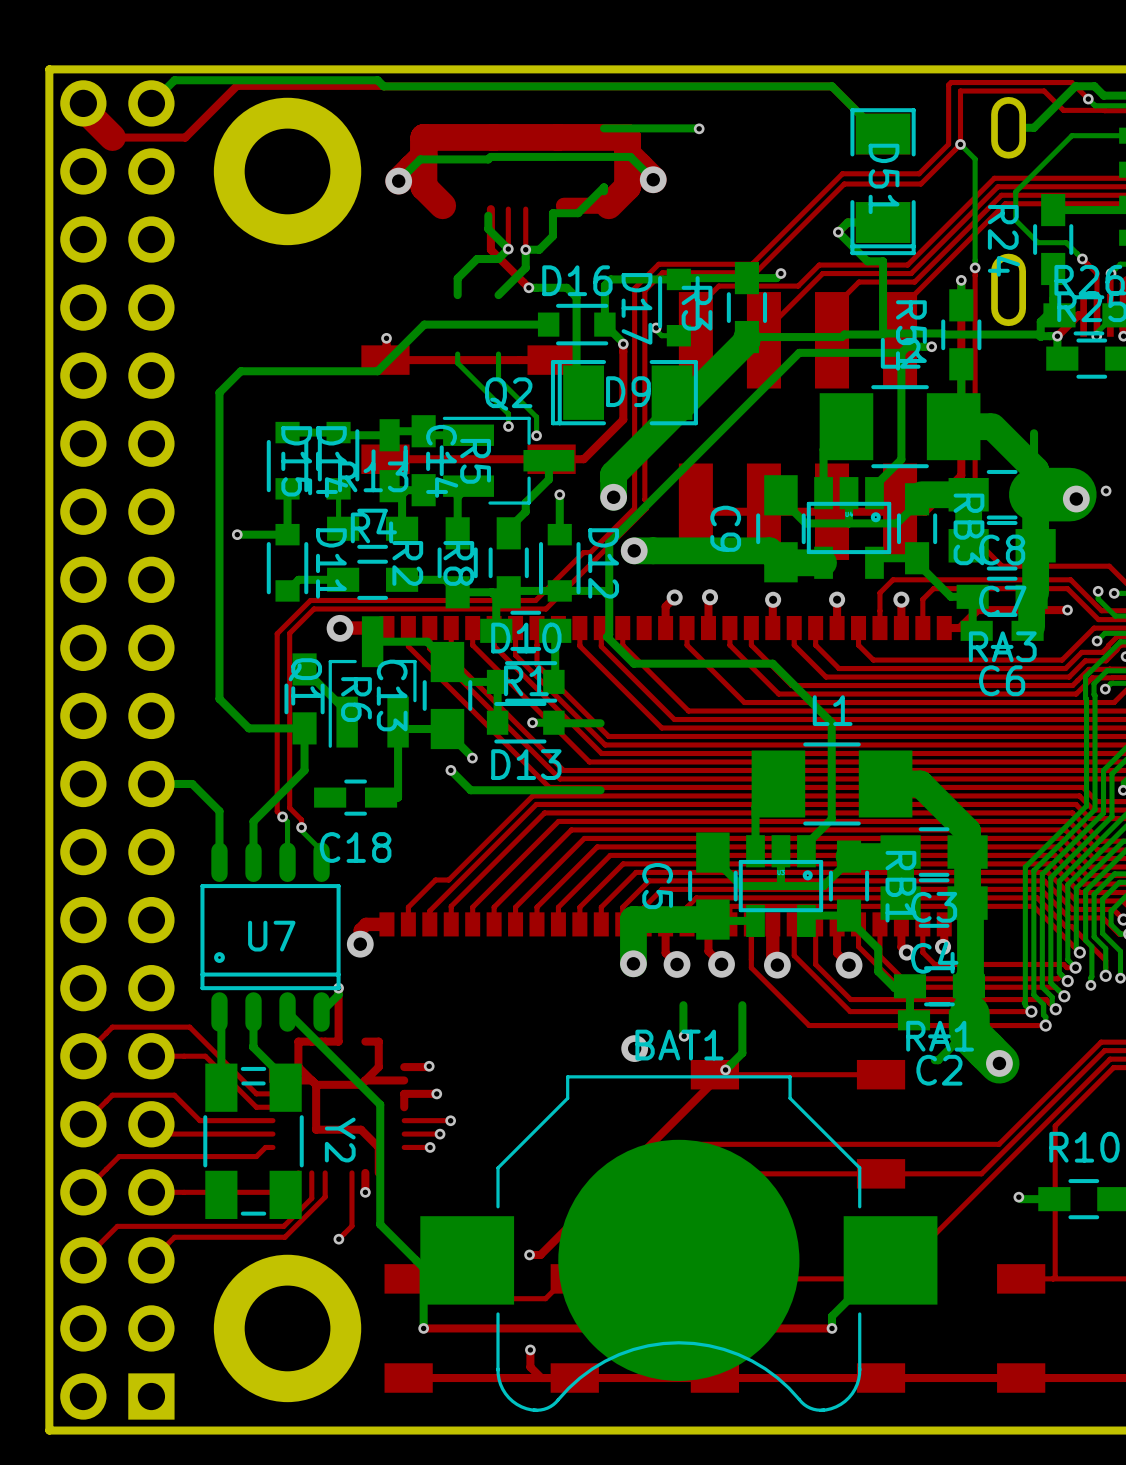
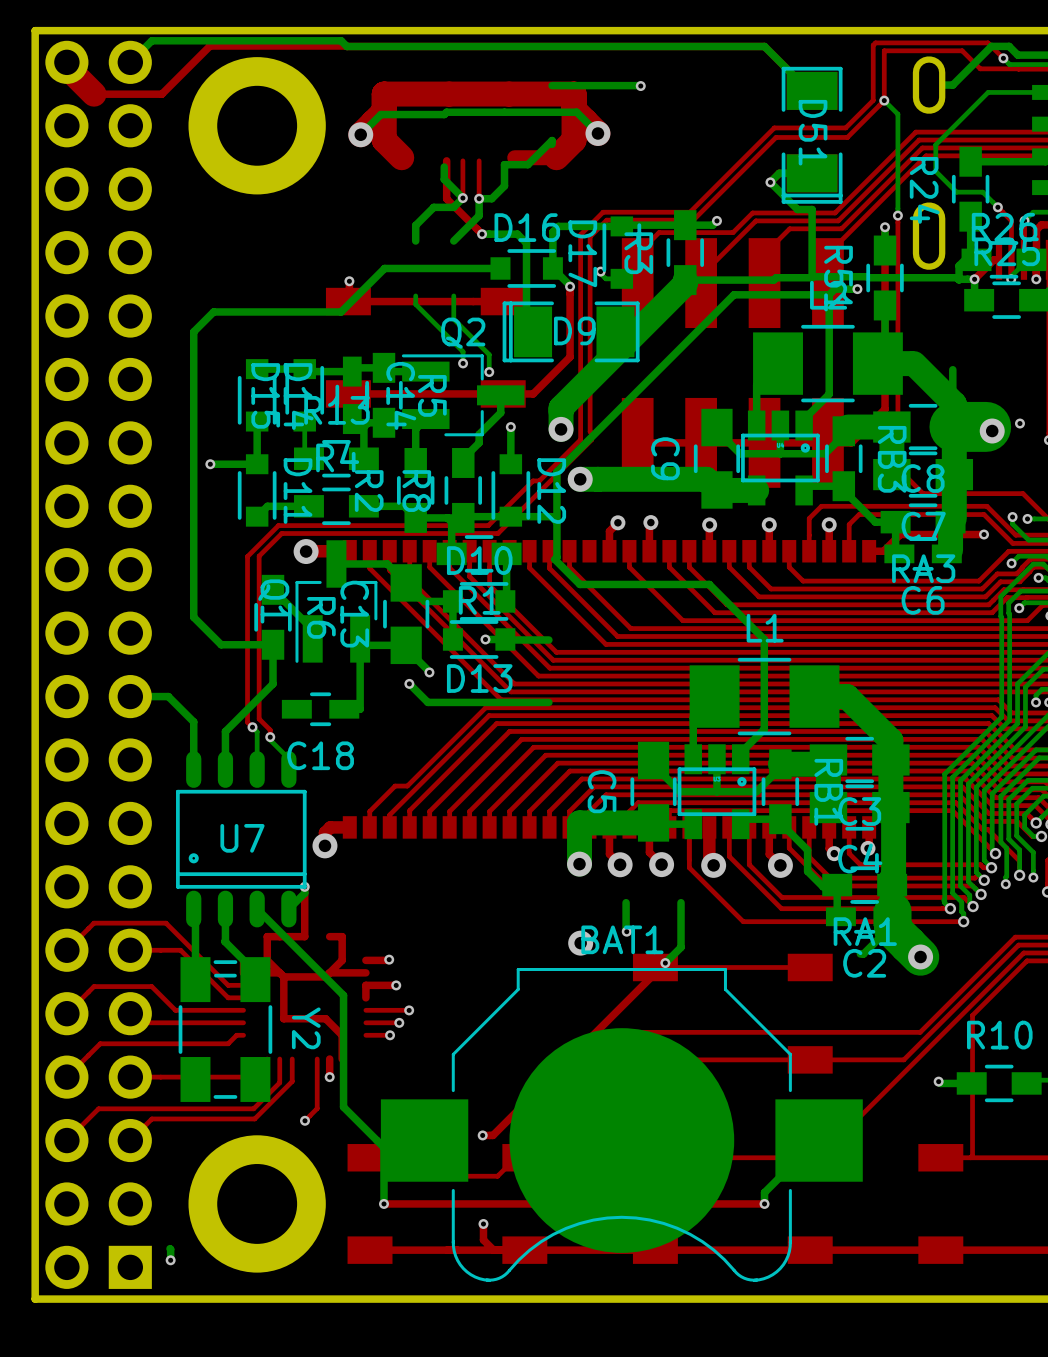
bottom track: none -> (170, 1248) (170, 1260)
via: none -> (170, 1260)

